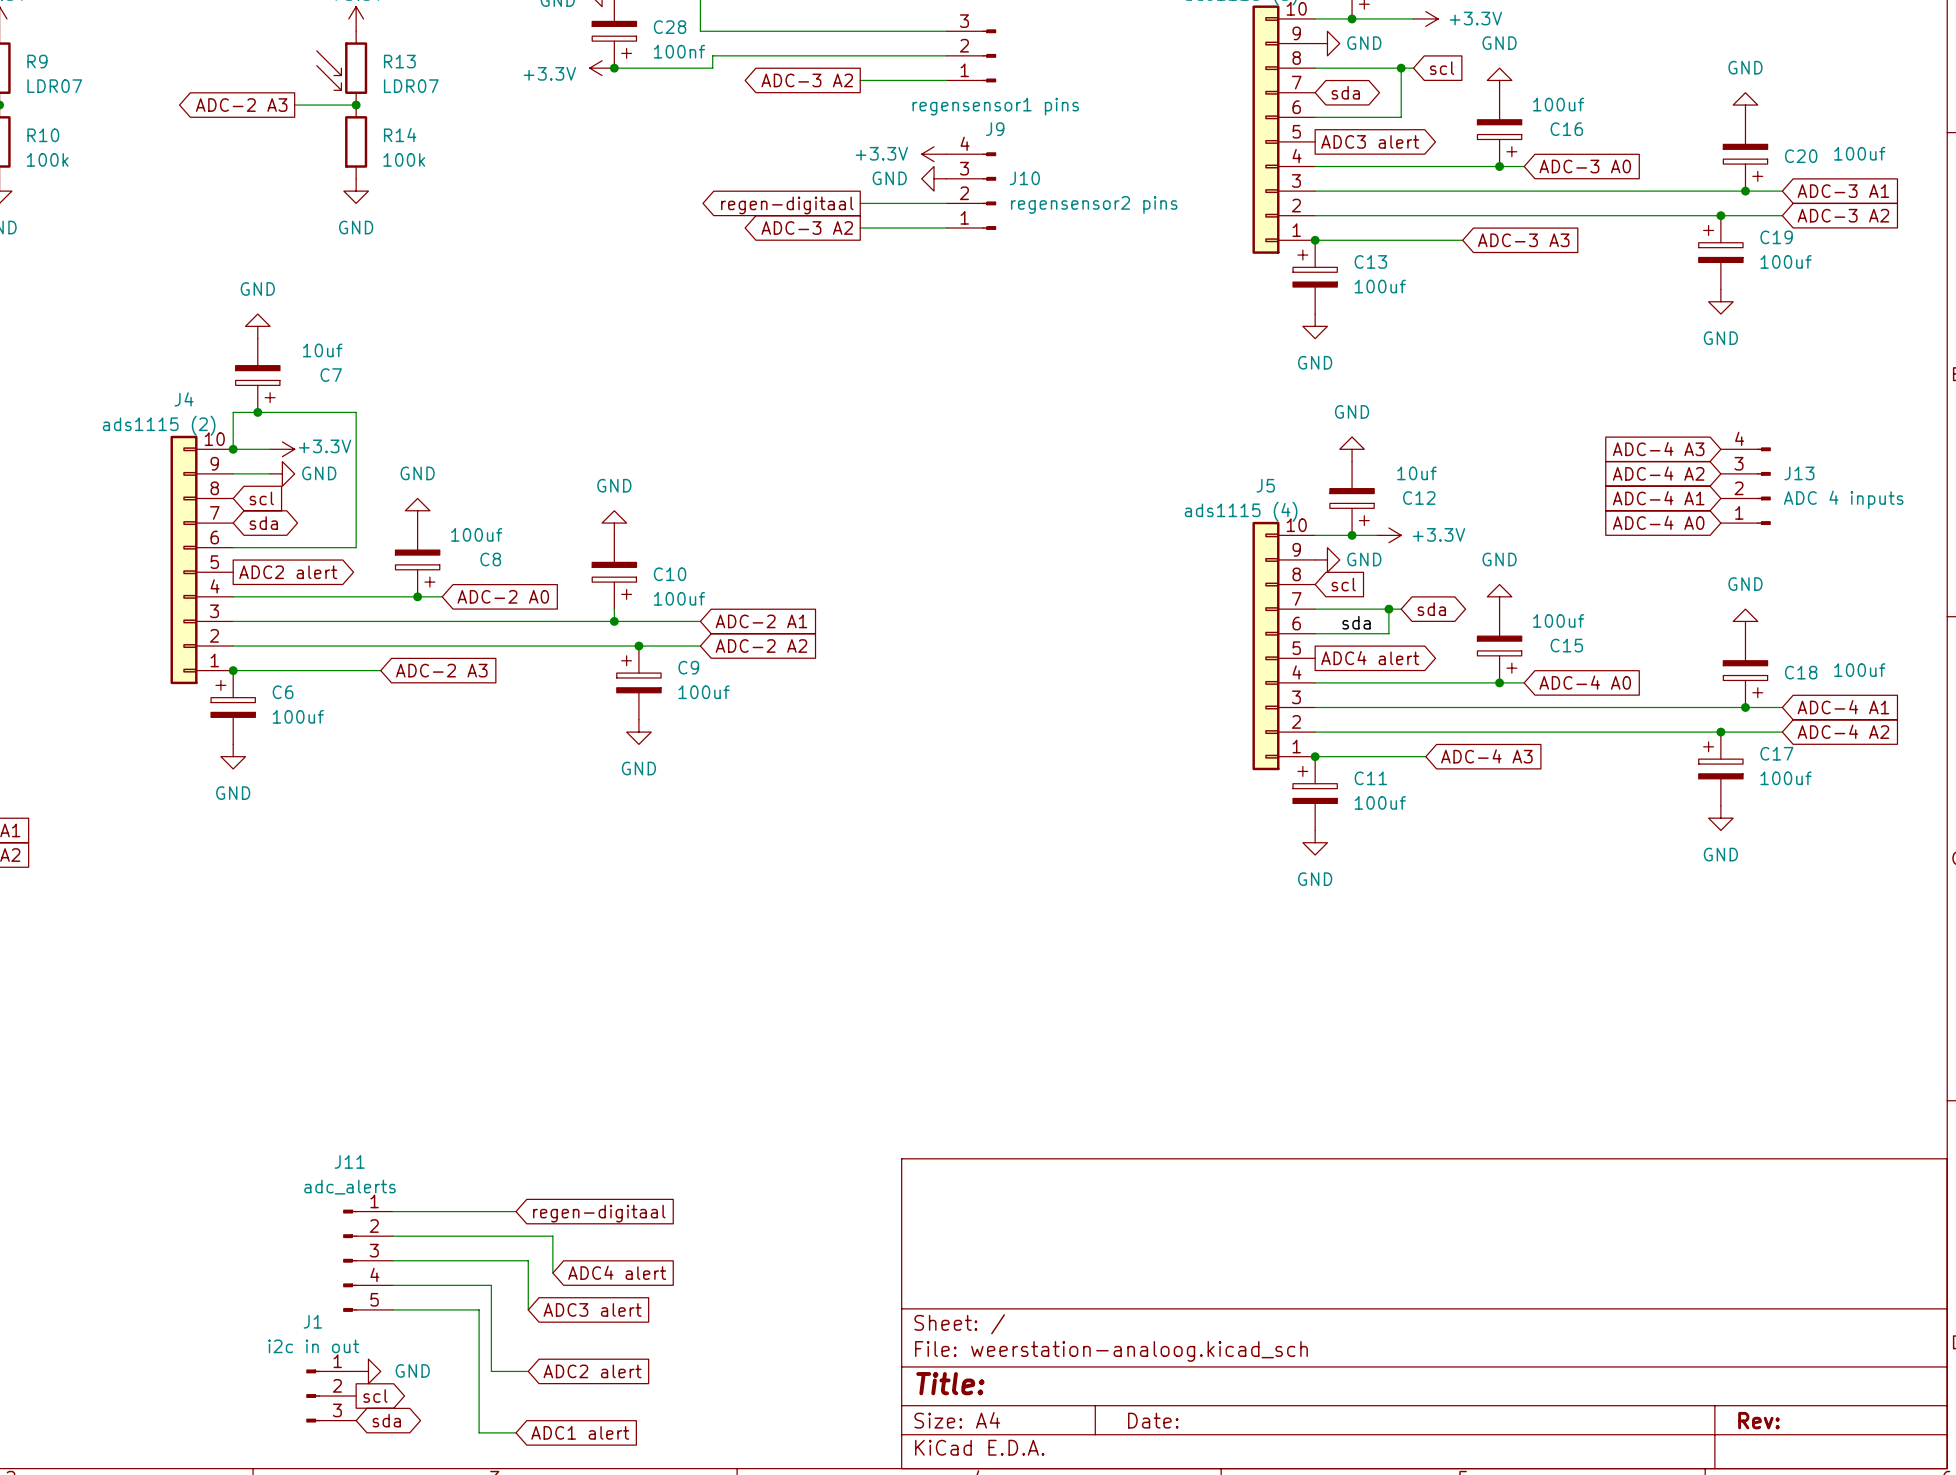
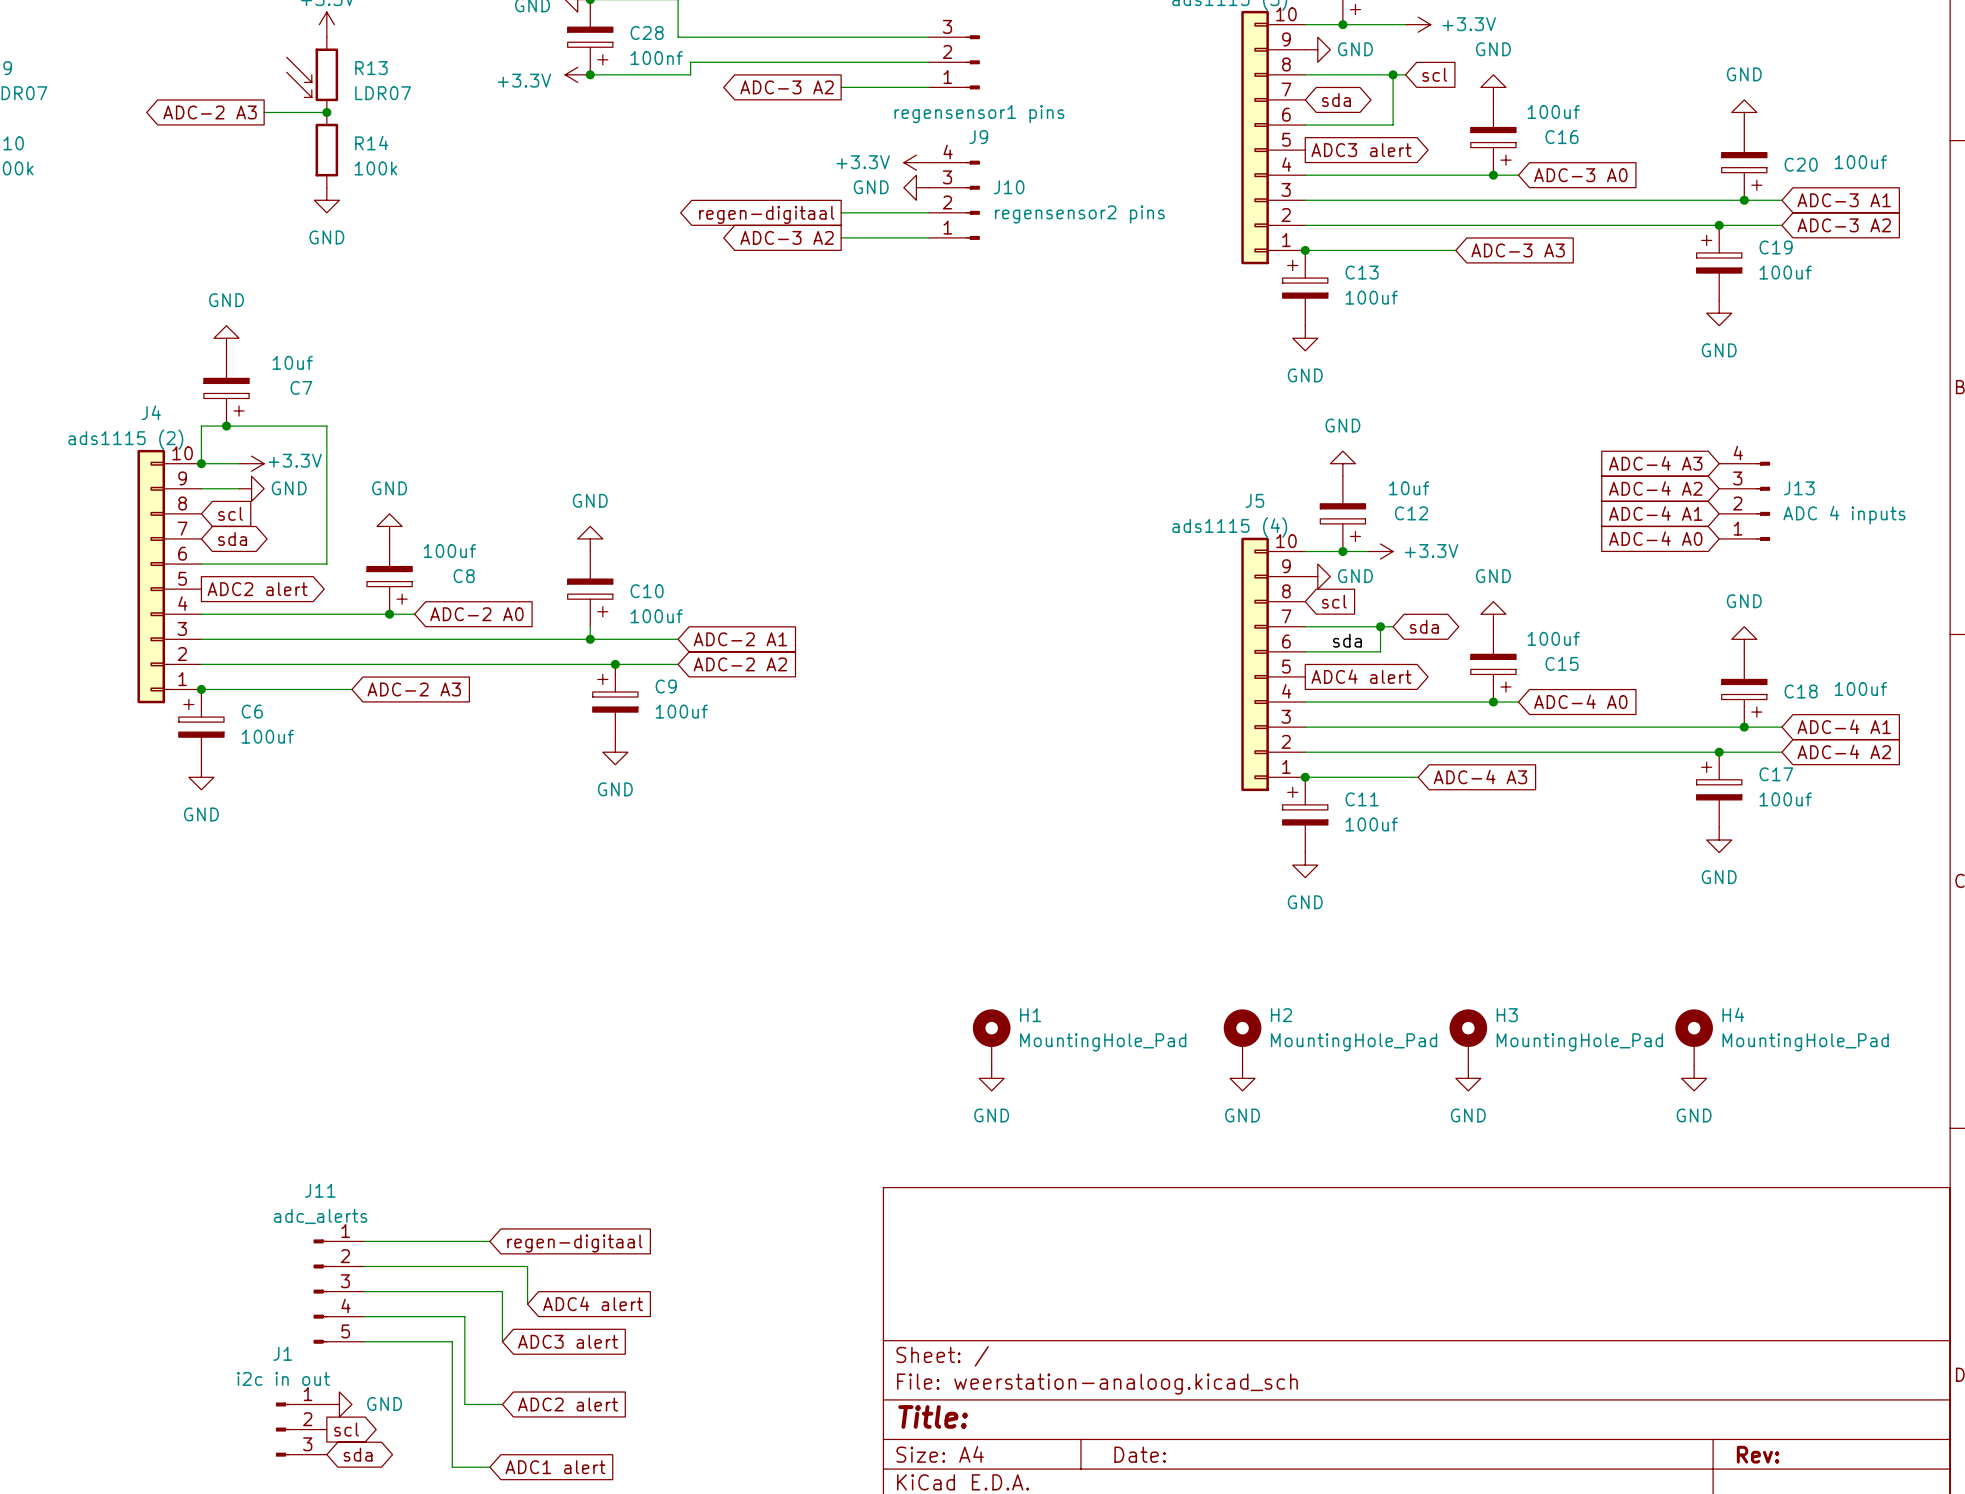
H1: none -> MountingHole_Pad (991, 1037)
H2: none -> MountingHole_Pad (1242, 1037)
H3: none -> MountingHole_Pad (1468, 1037)
H4: none -> MountingHole_Pad (1694, 1037)
power symbol: none -> GND (991, 1078)
power symbol: none -> GND (1242, 1078)
power symbol: none -> GND (1468, 1078)
power symbol: none -> GND (1694, 1078)

